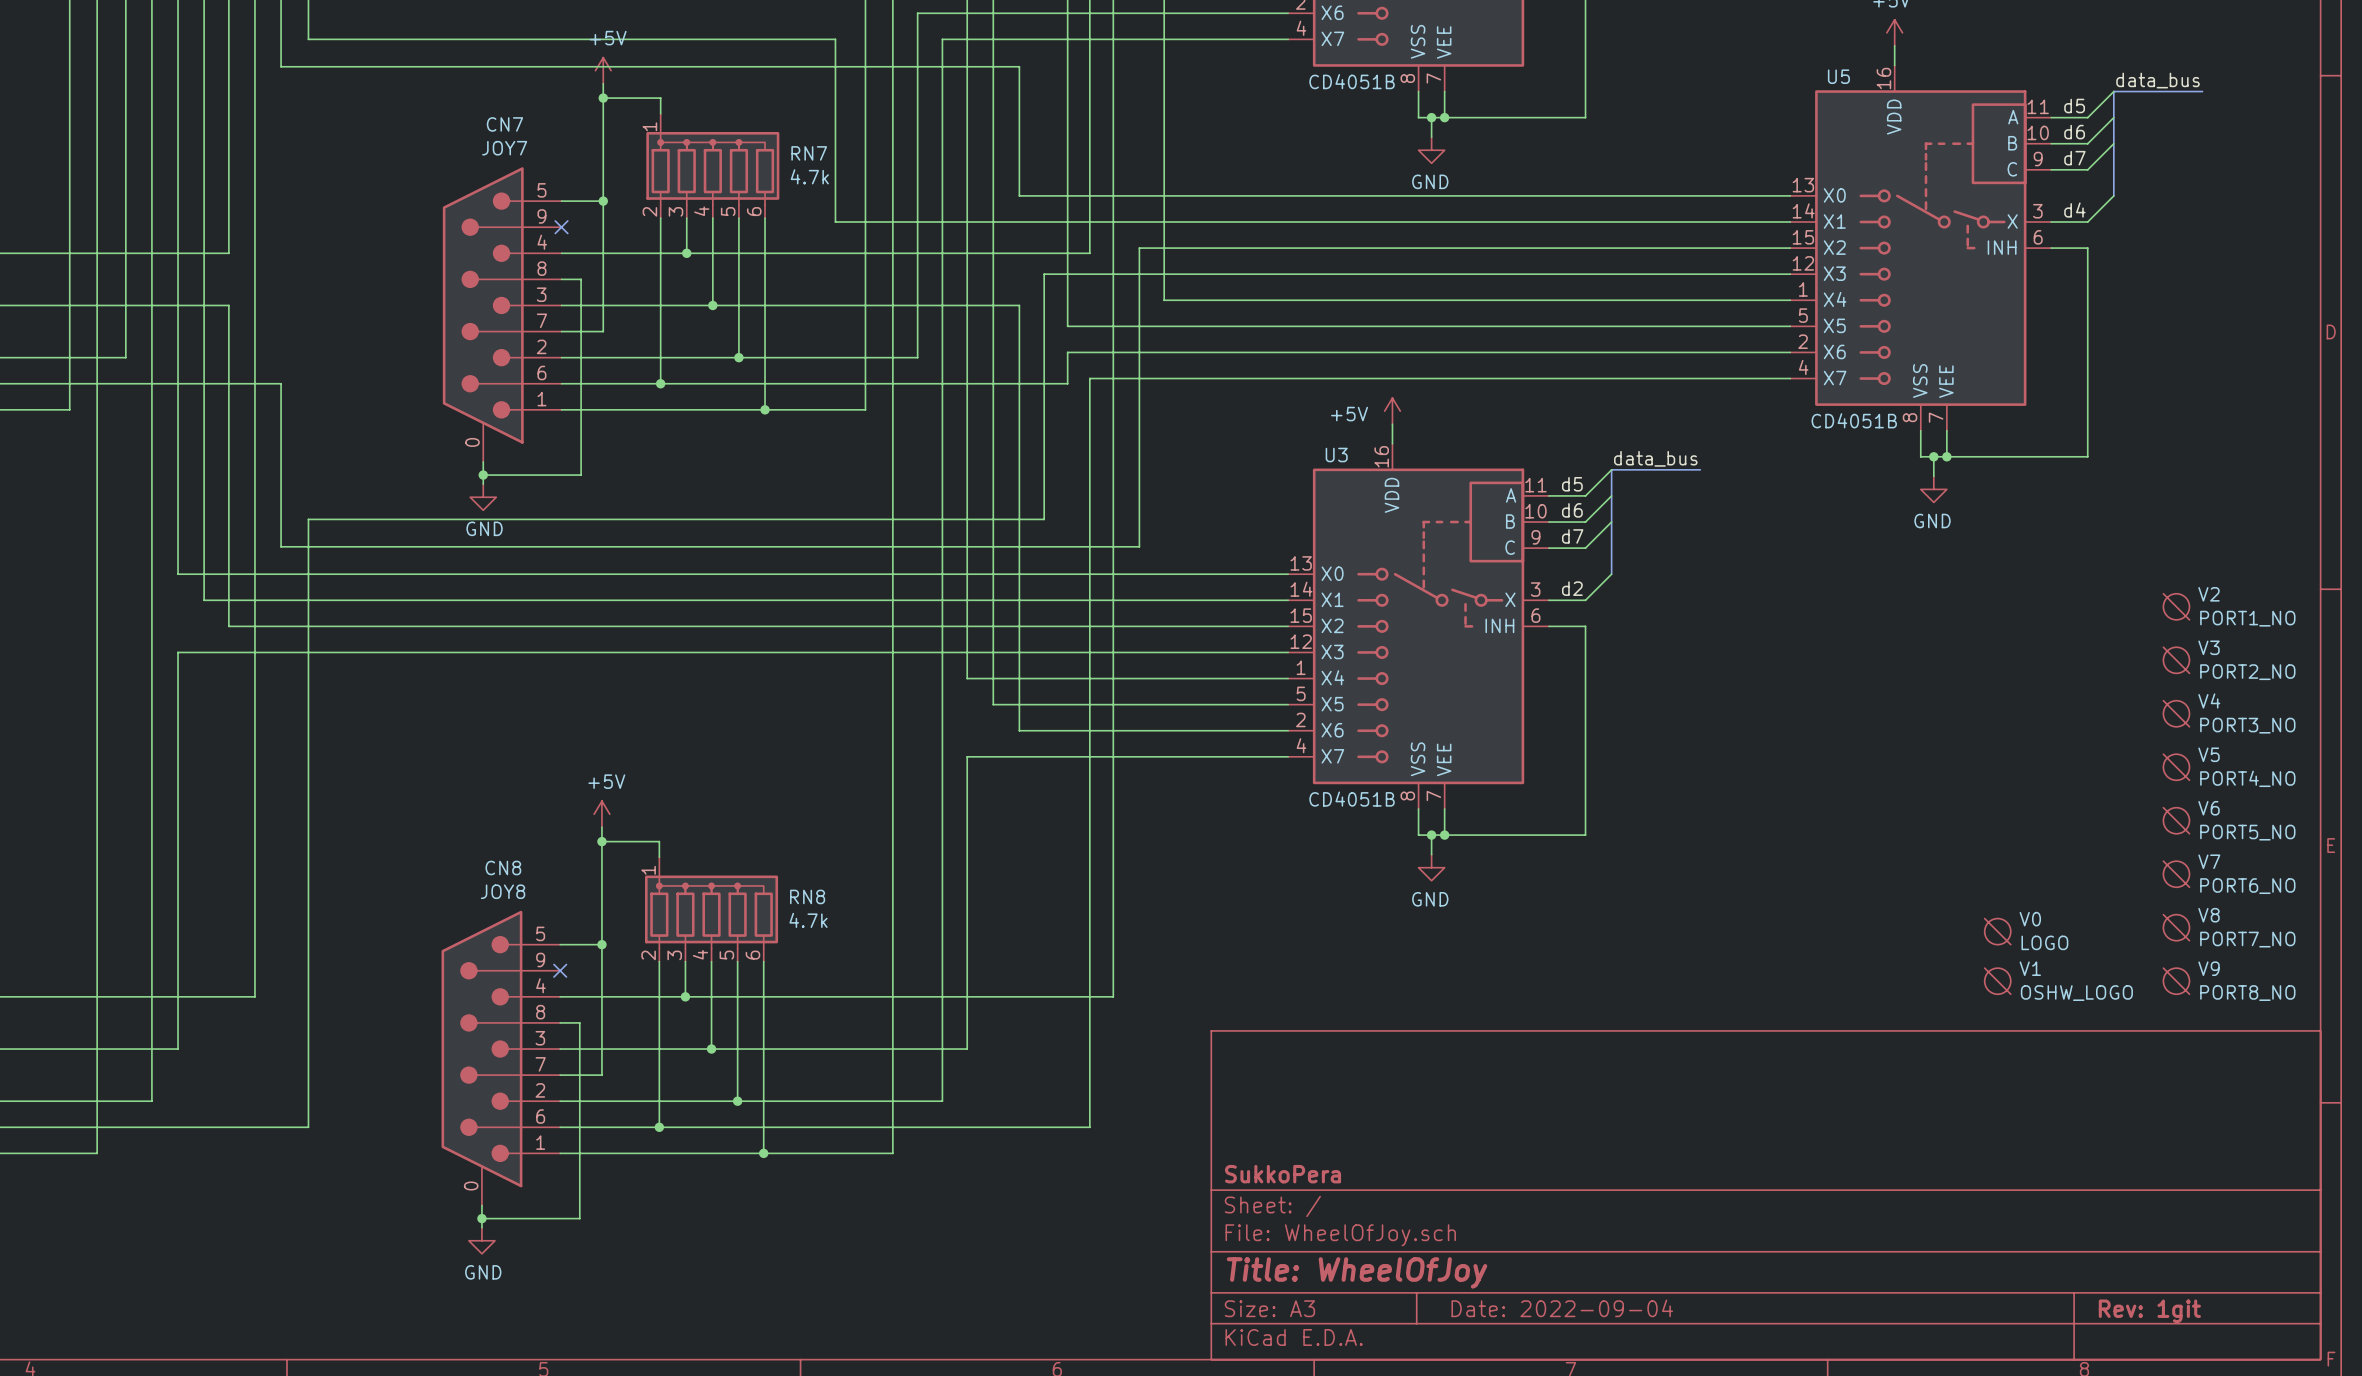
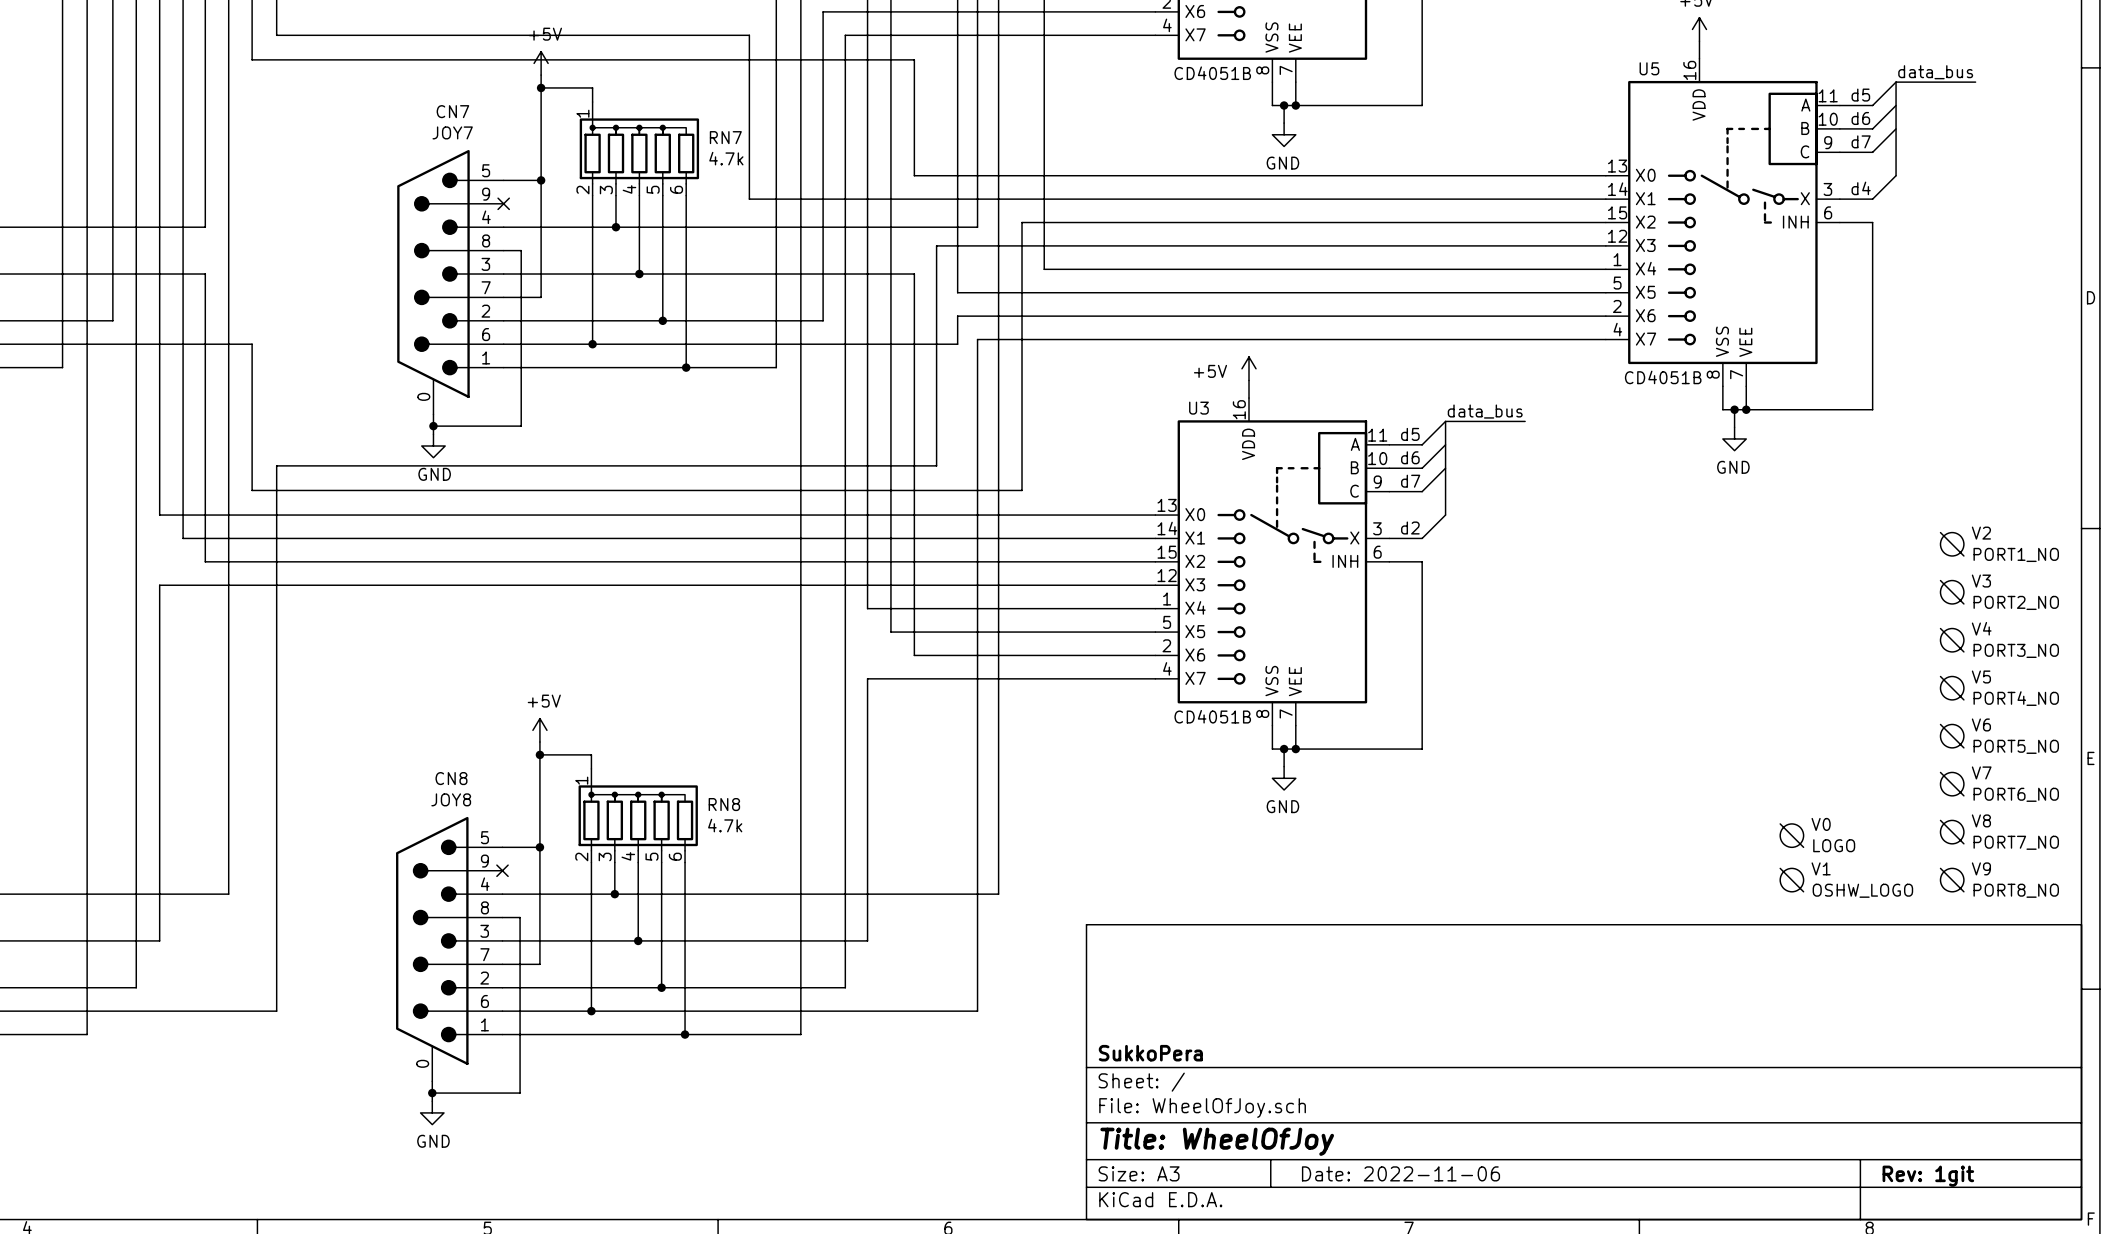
title block: Date: 2022-09-04 (1562, 1308) -> Date: 2022-11-06 (1400, 1173)

